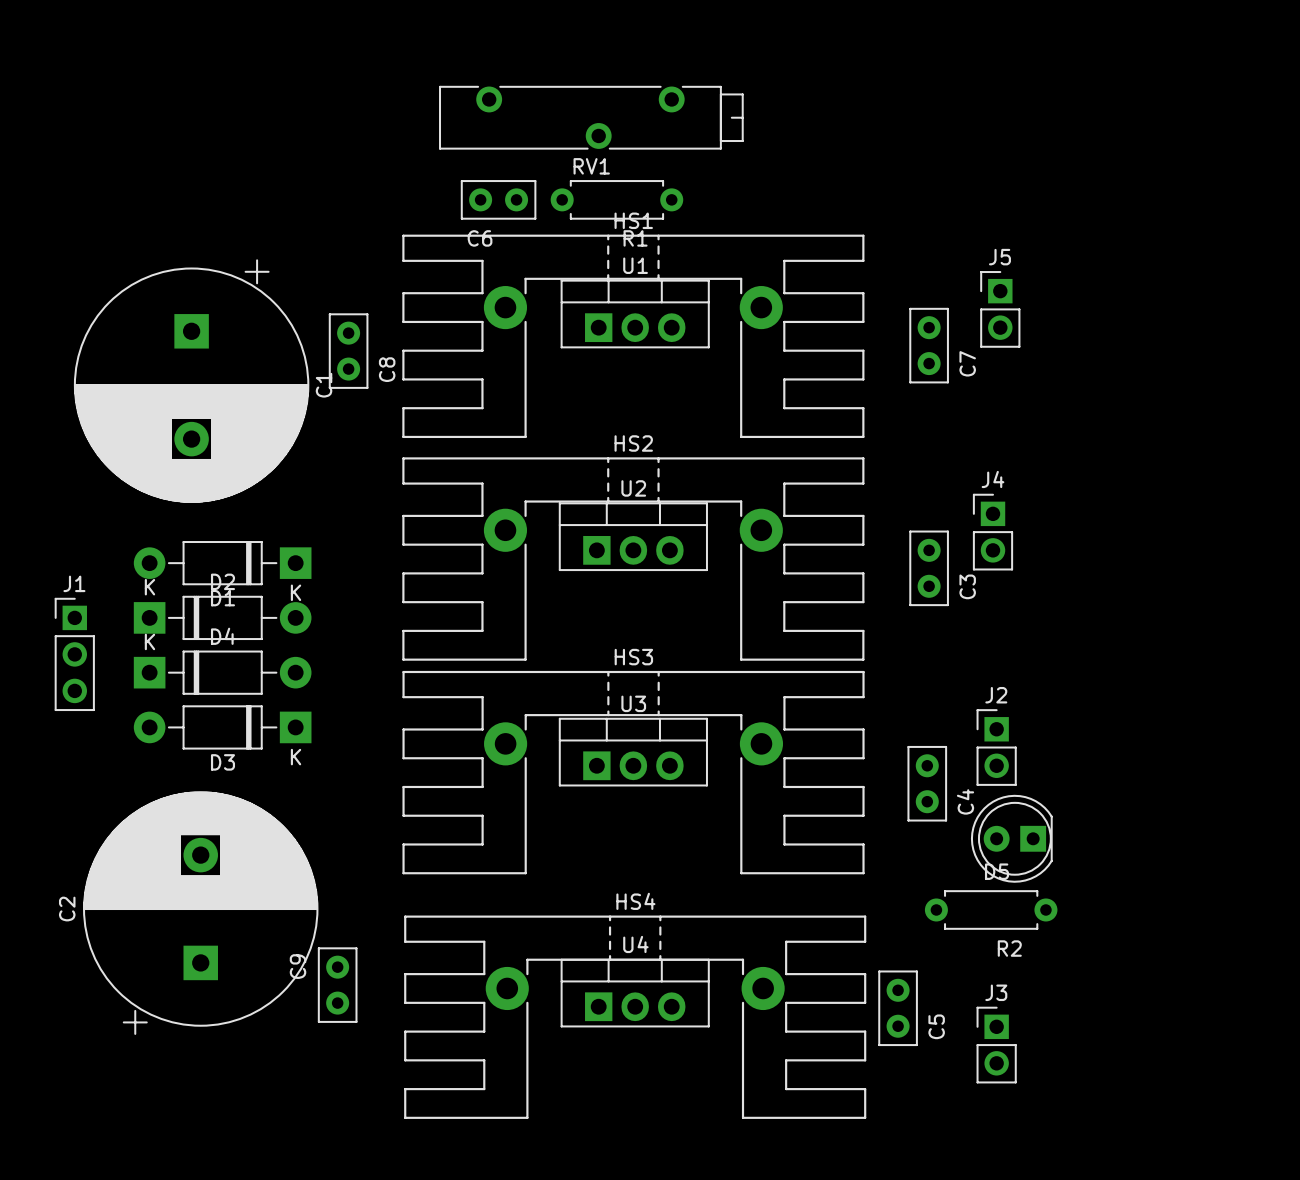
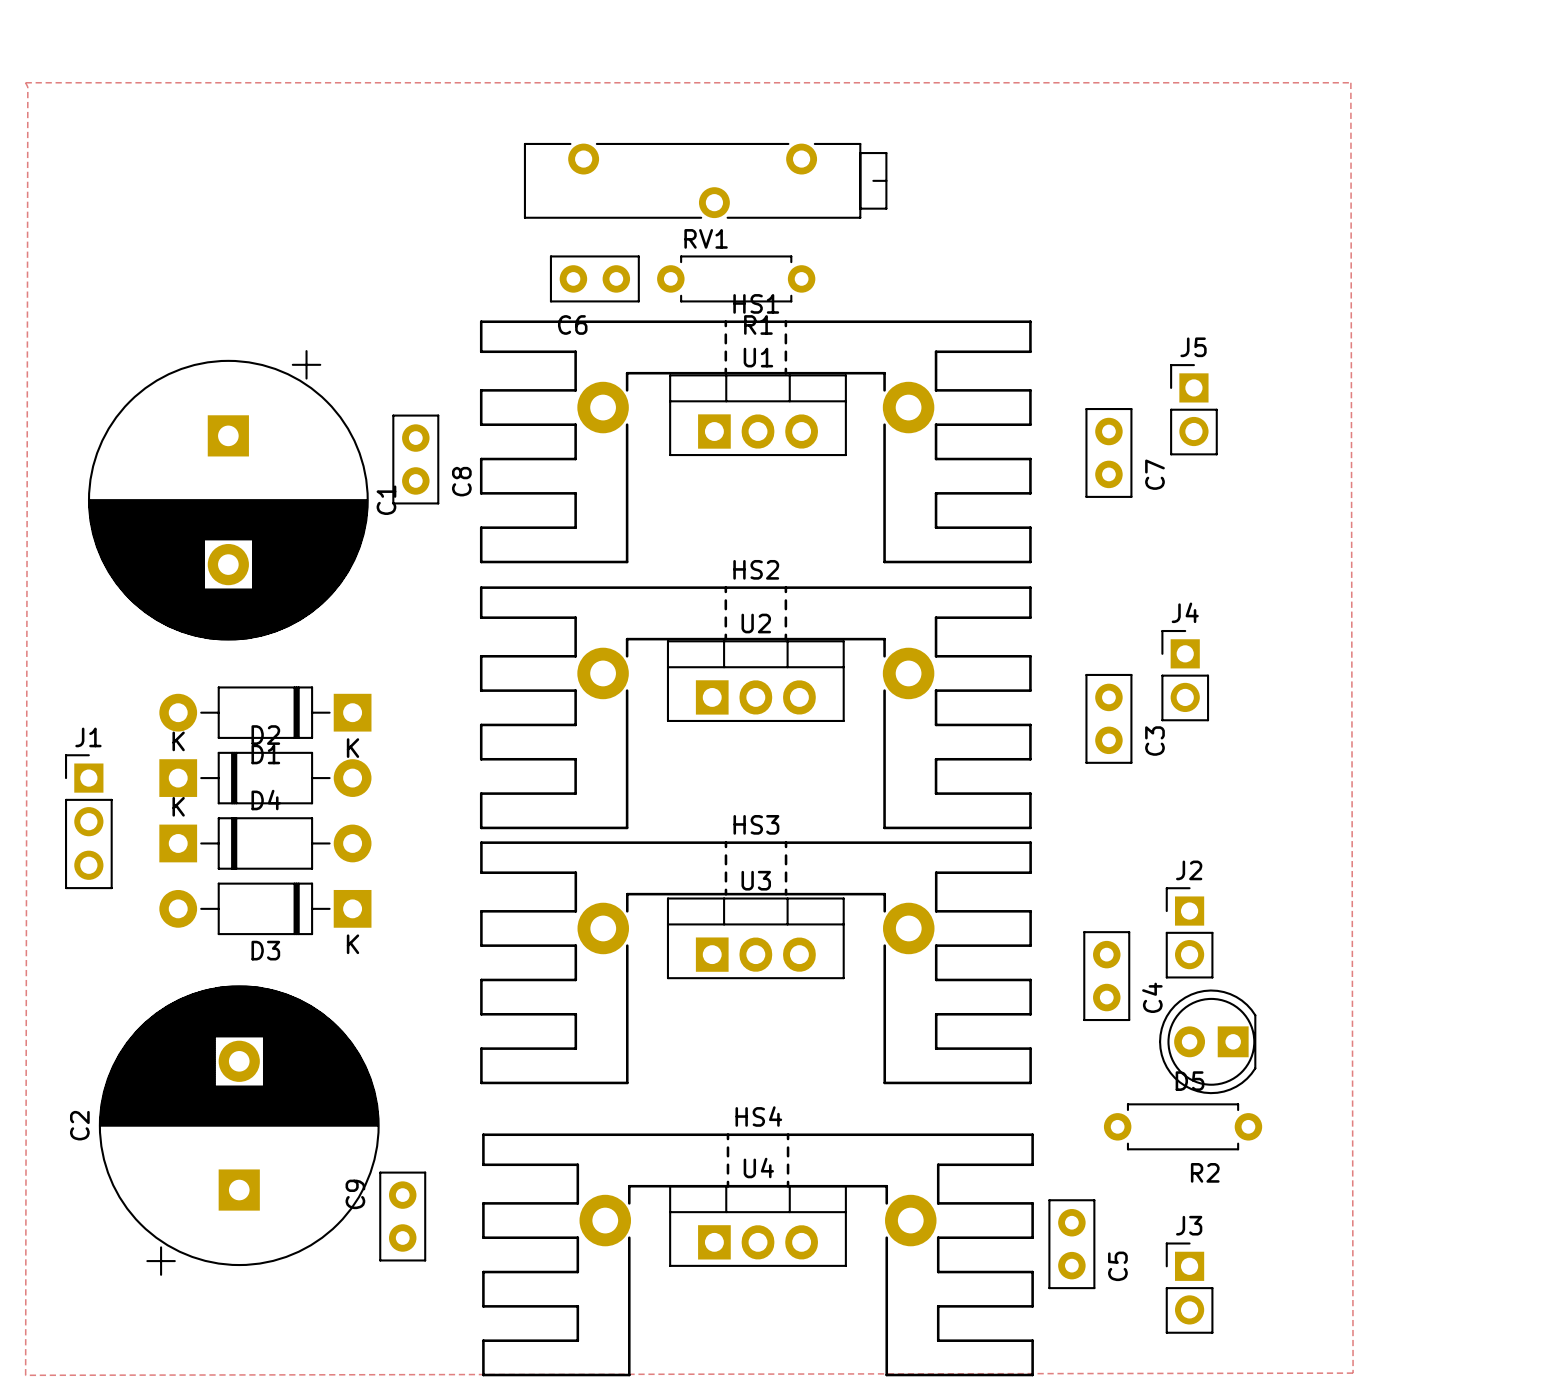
zone outline: none -> (25, 82) (27, 87) (25, 1375) (1353, 1373) (1350, 82) (25, 82)

